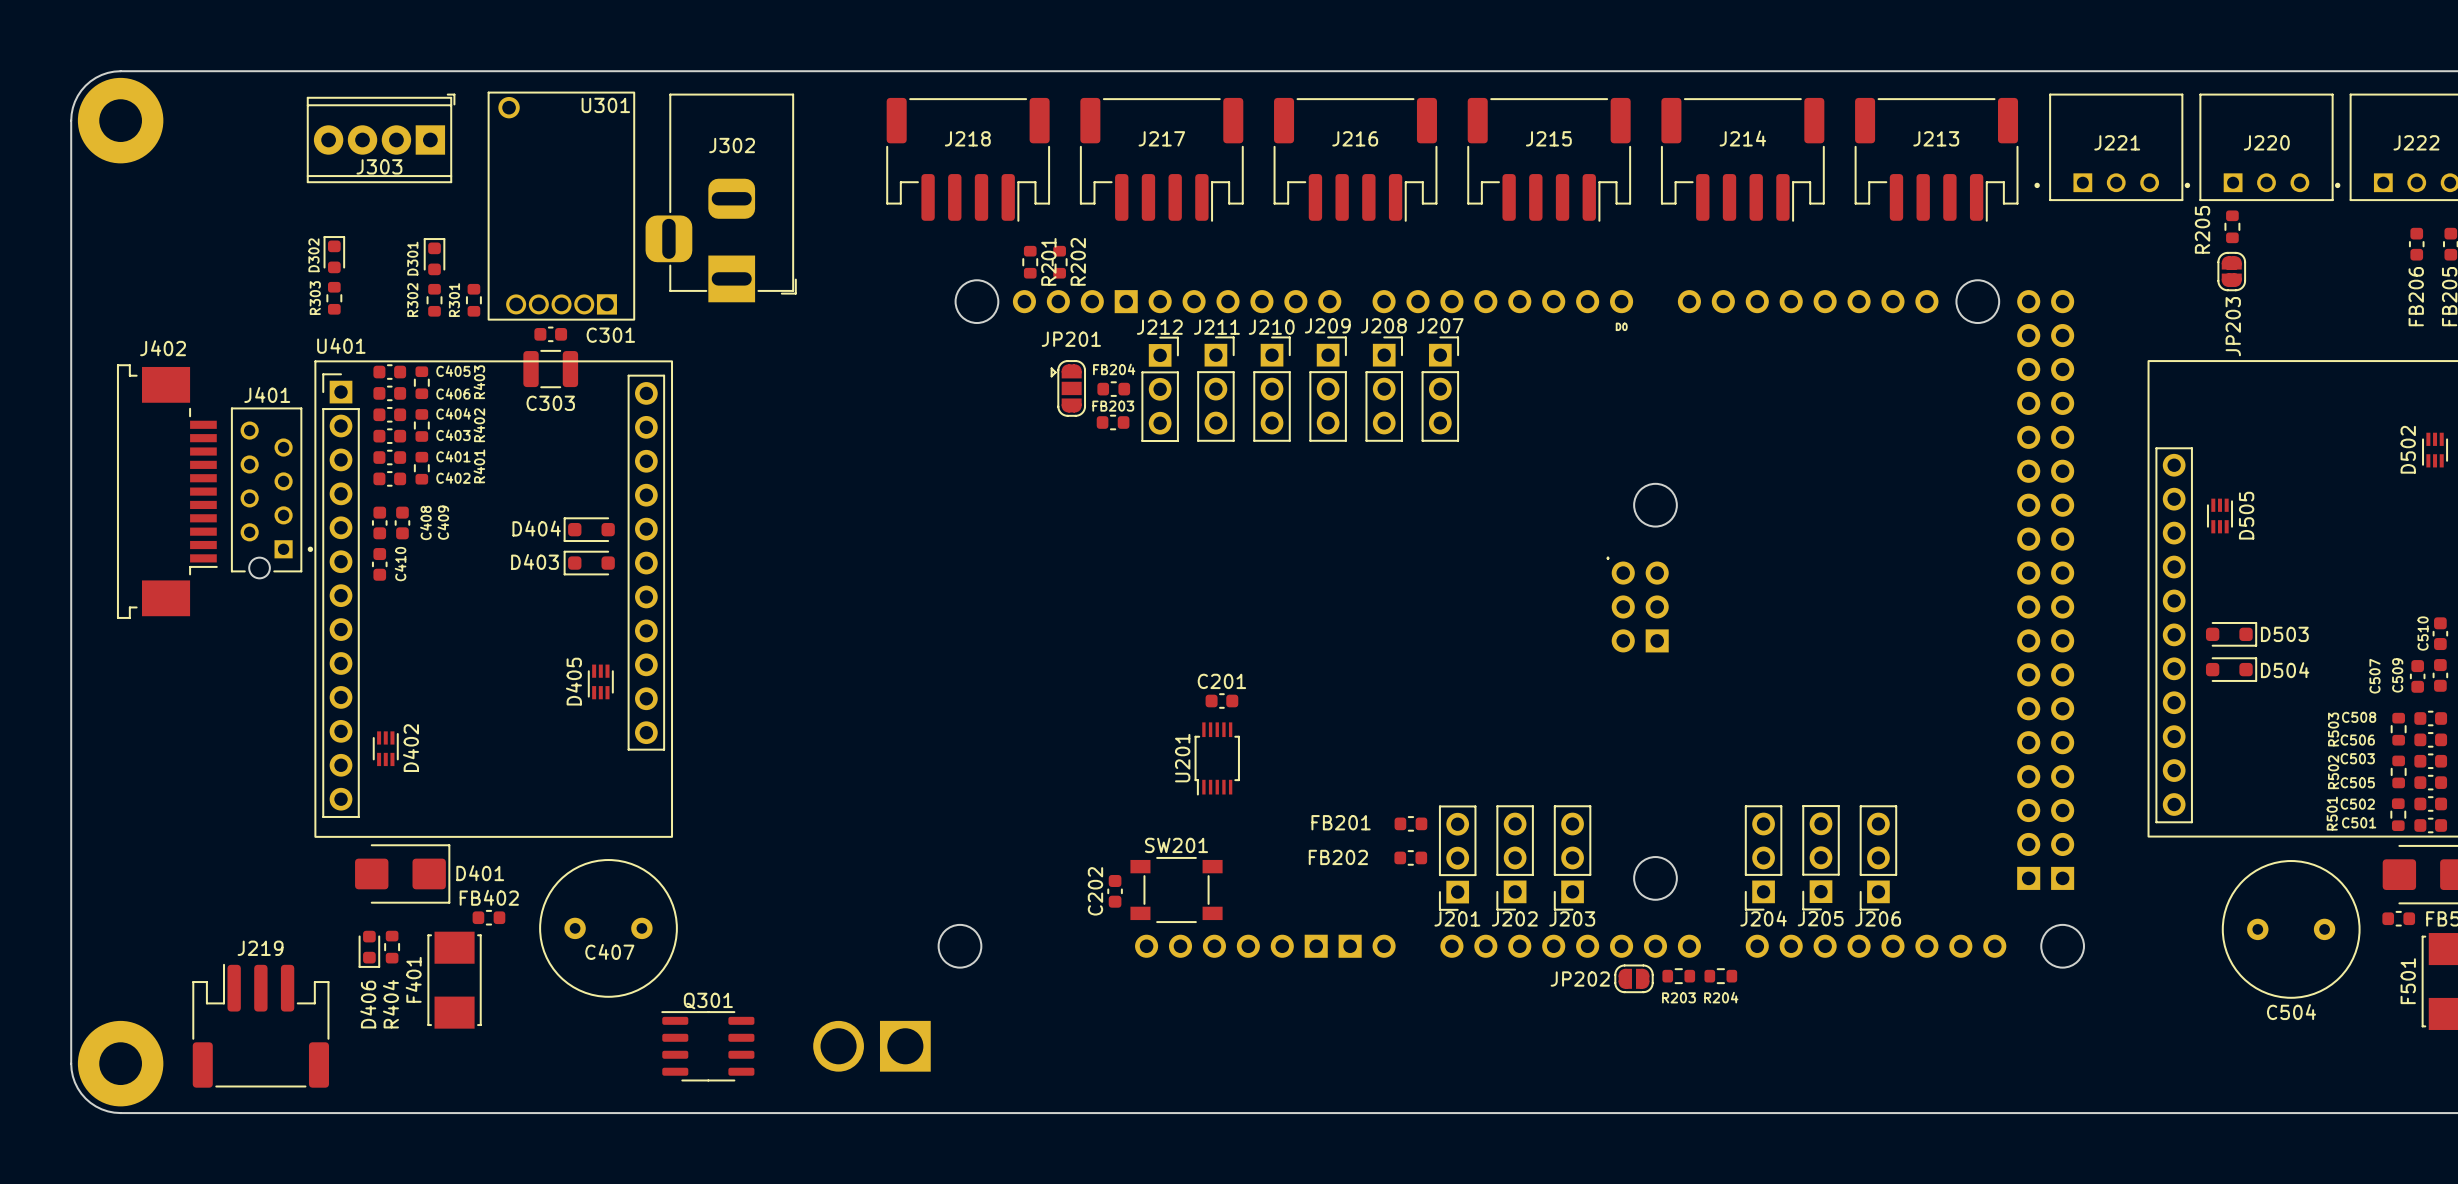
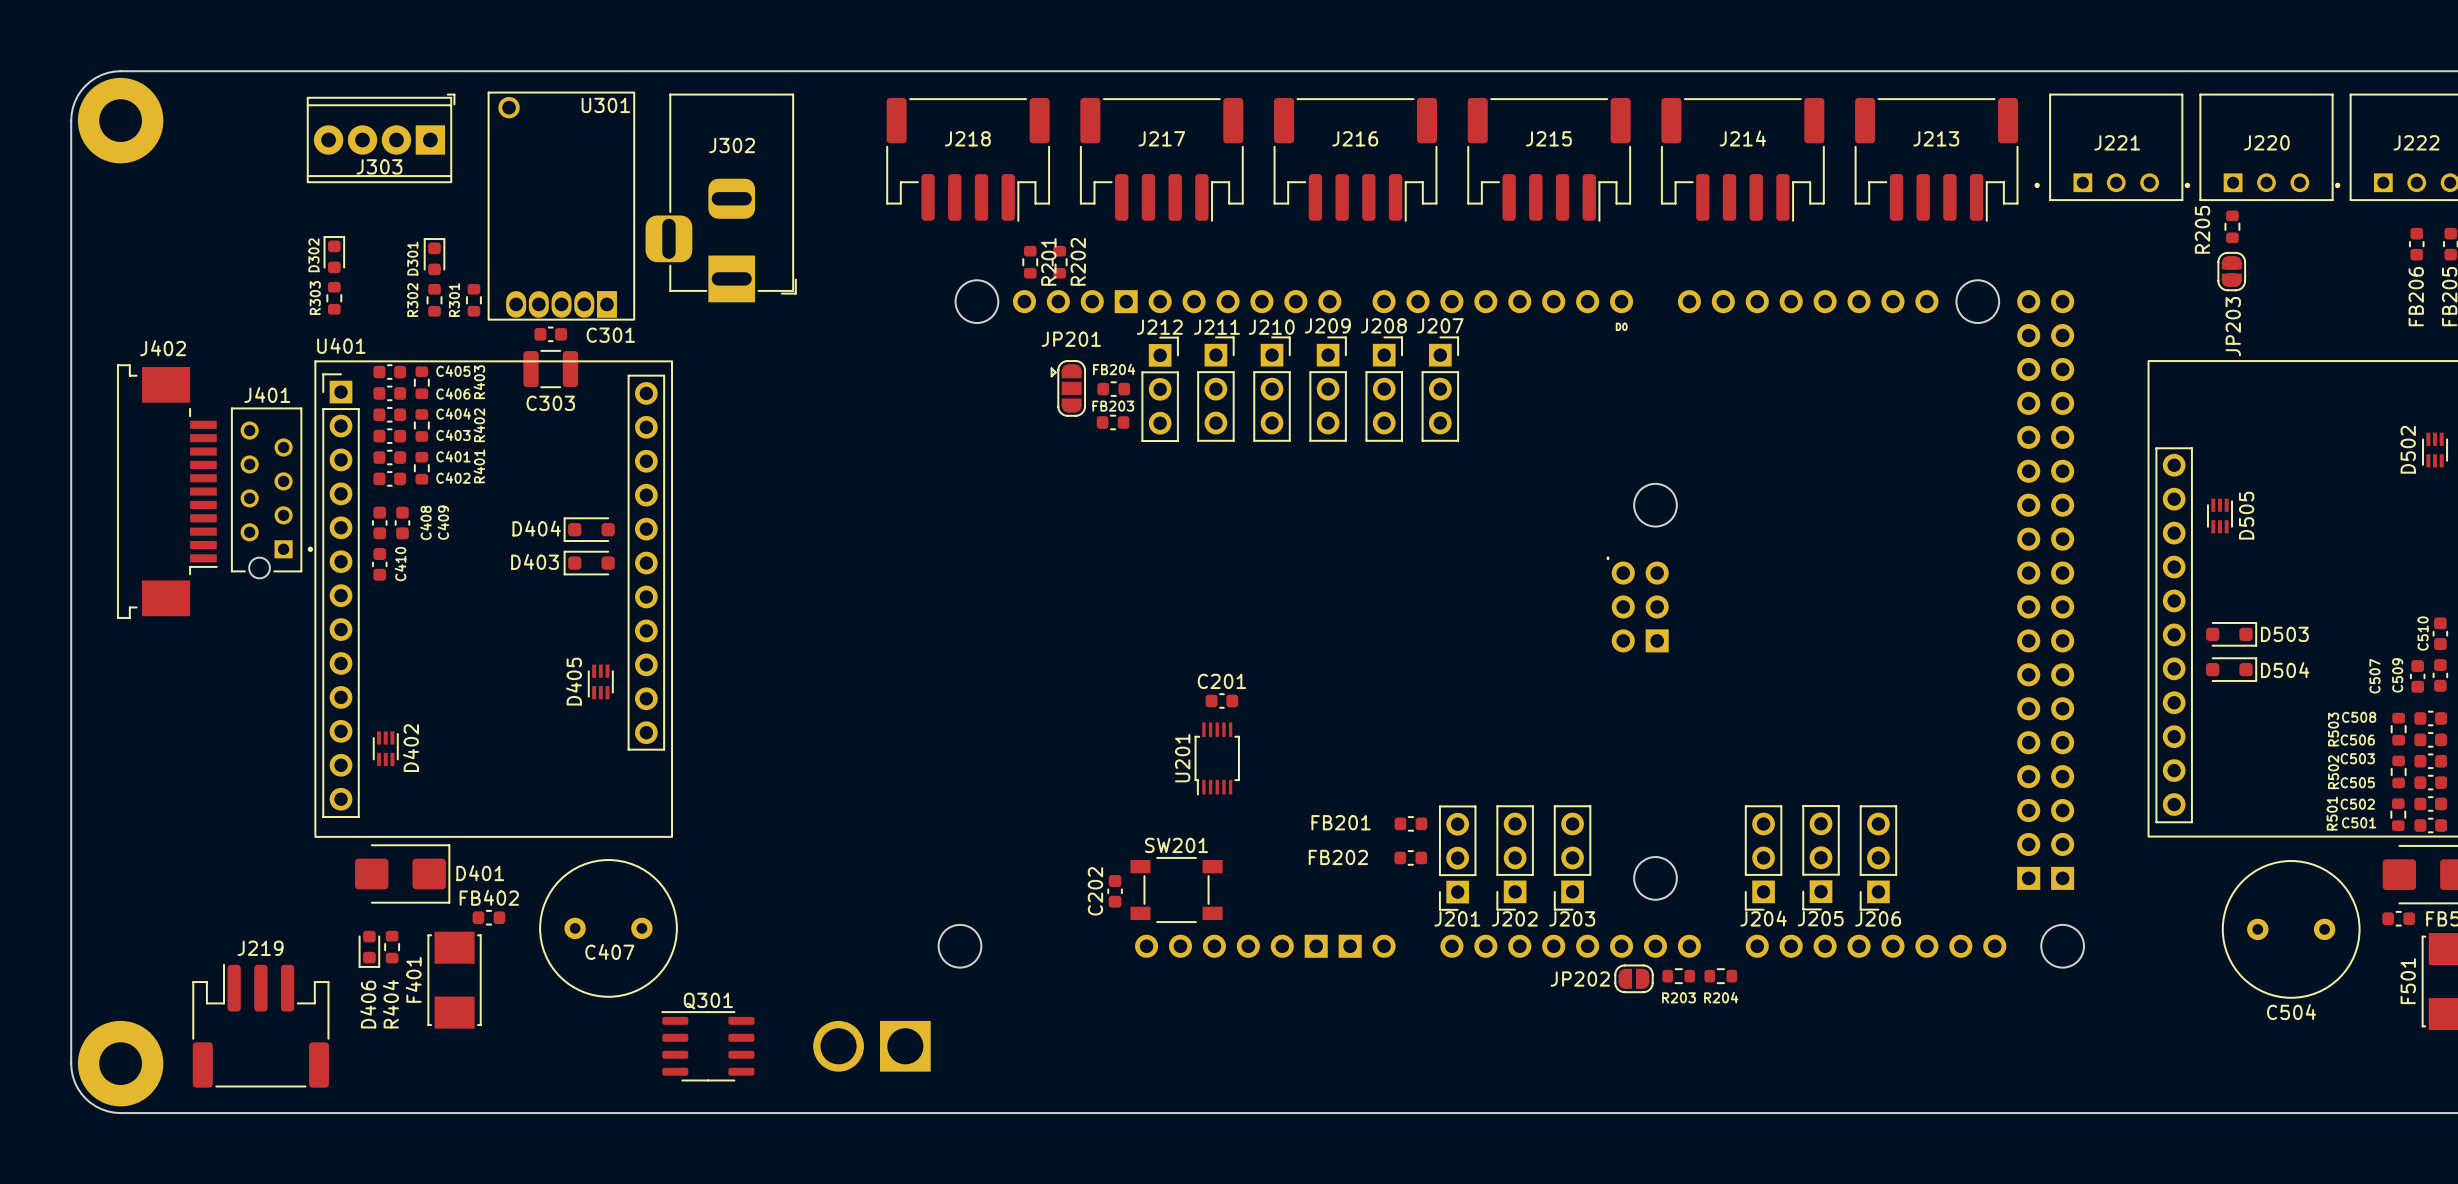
U301 footprint: [487, 91, 636, 321] -> [487, 91, 636, 321]

